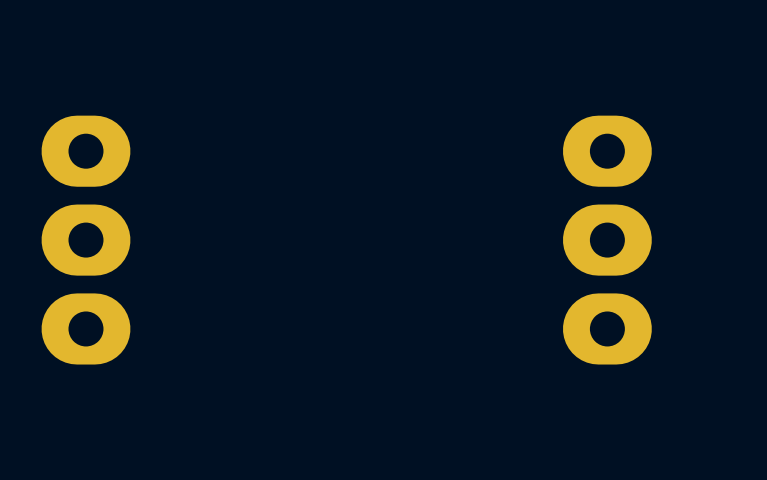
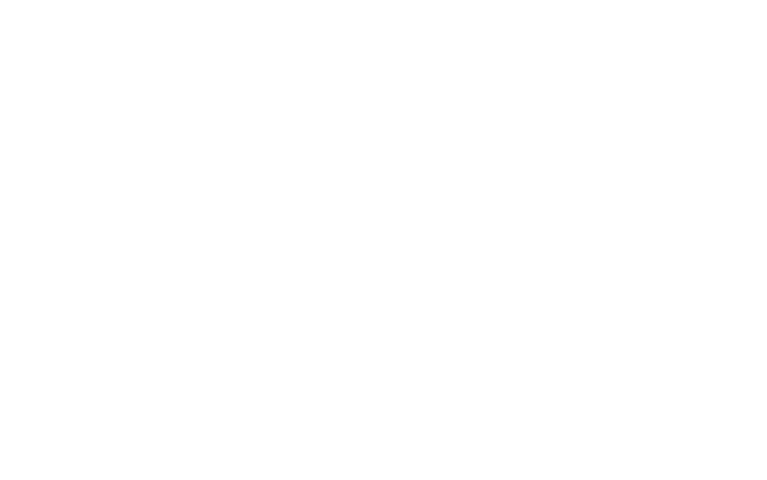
part: (85, 240) -> none
part: (607, 240) -> none

